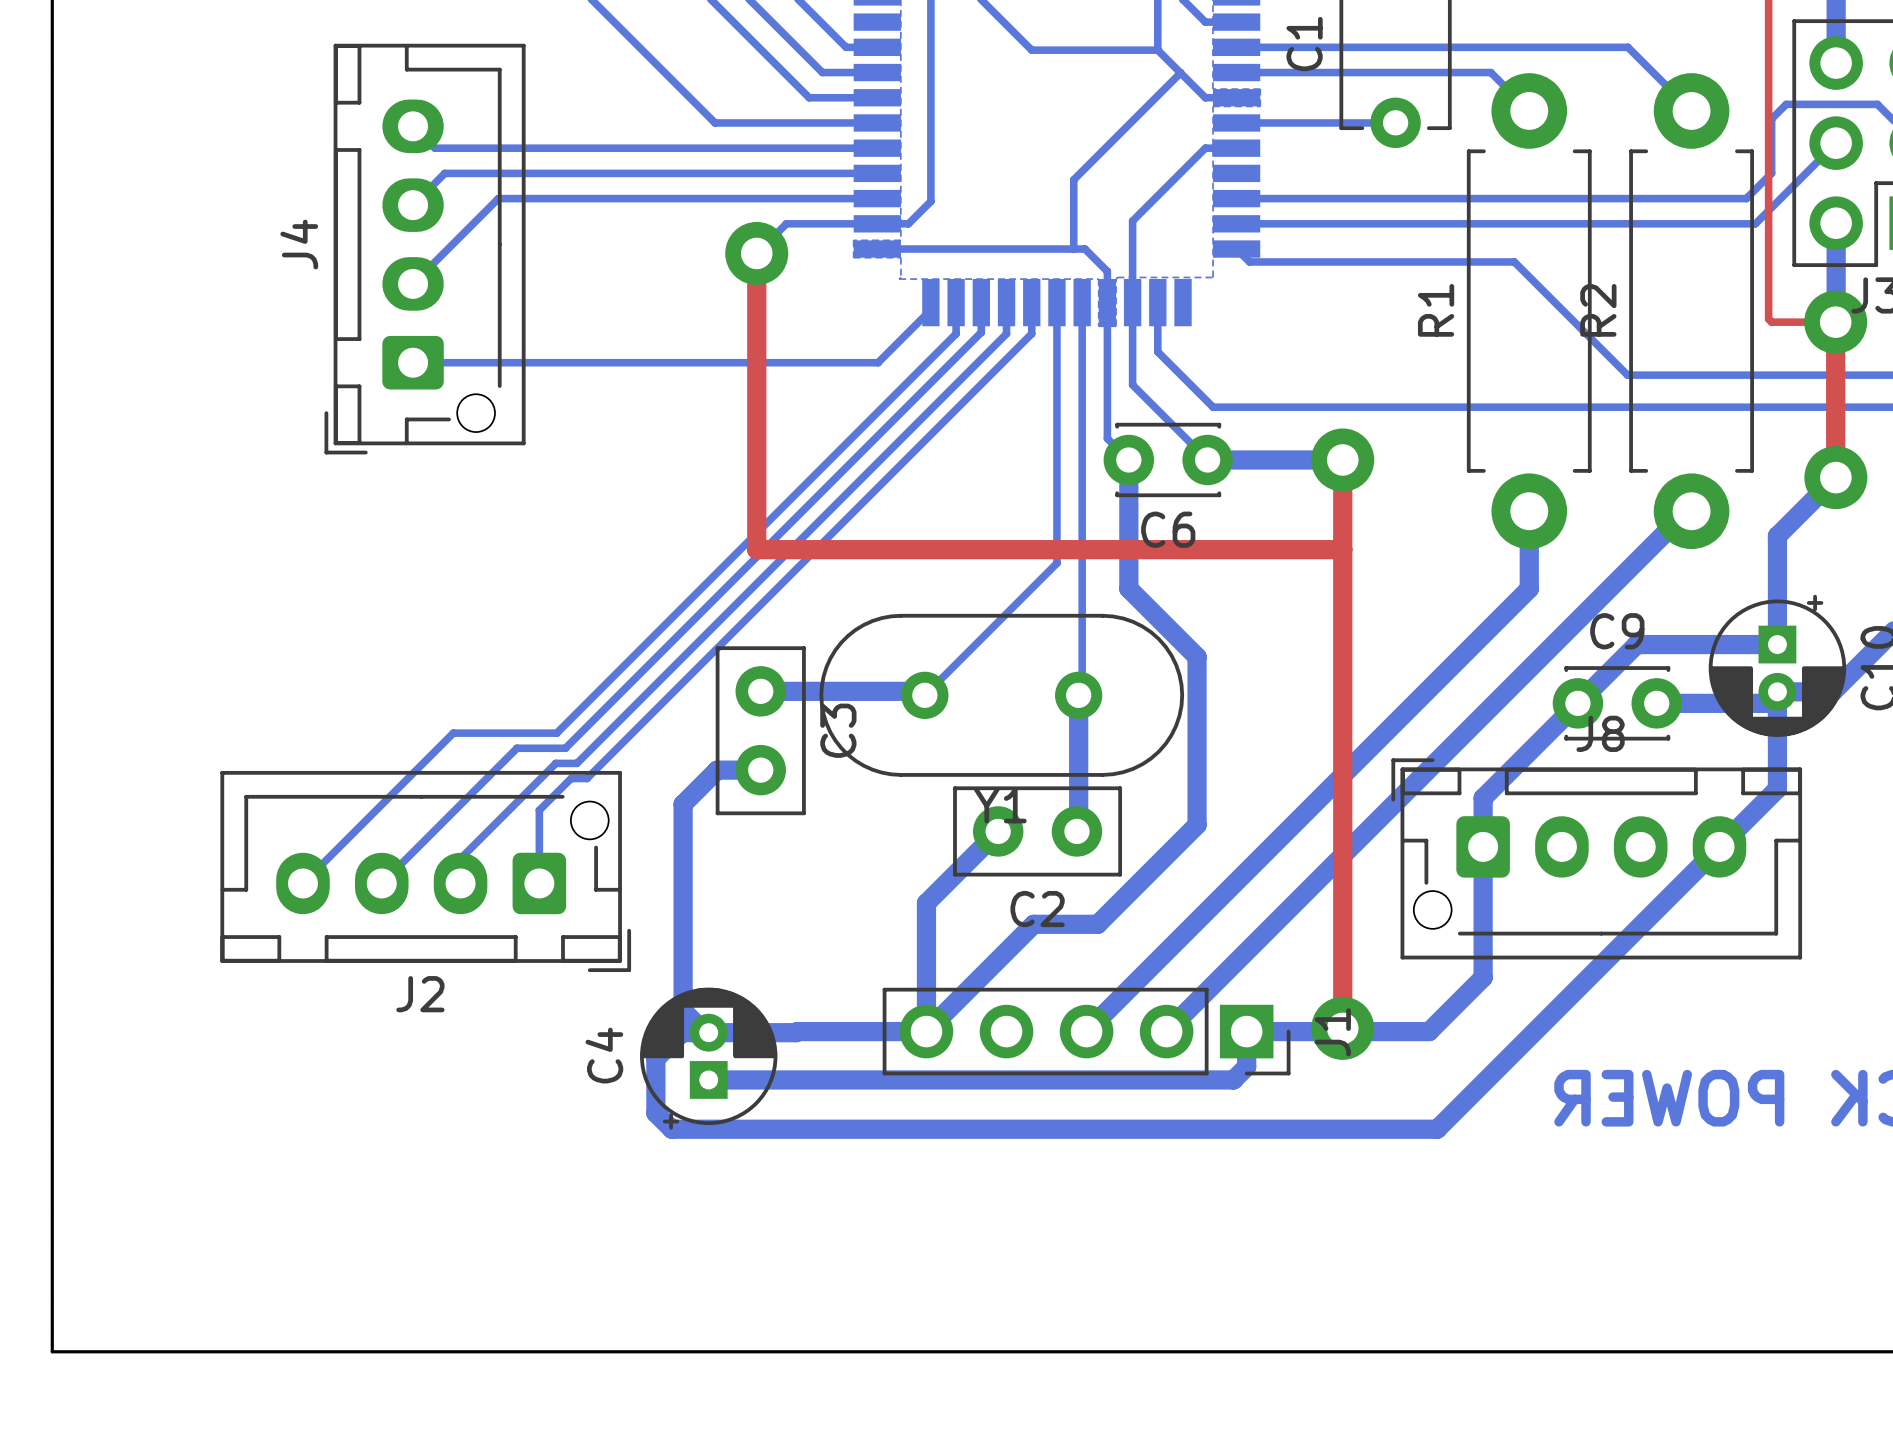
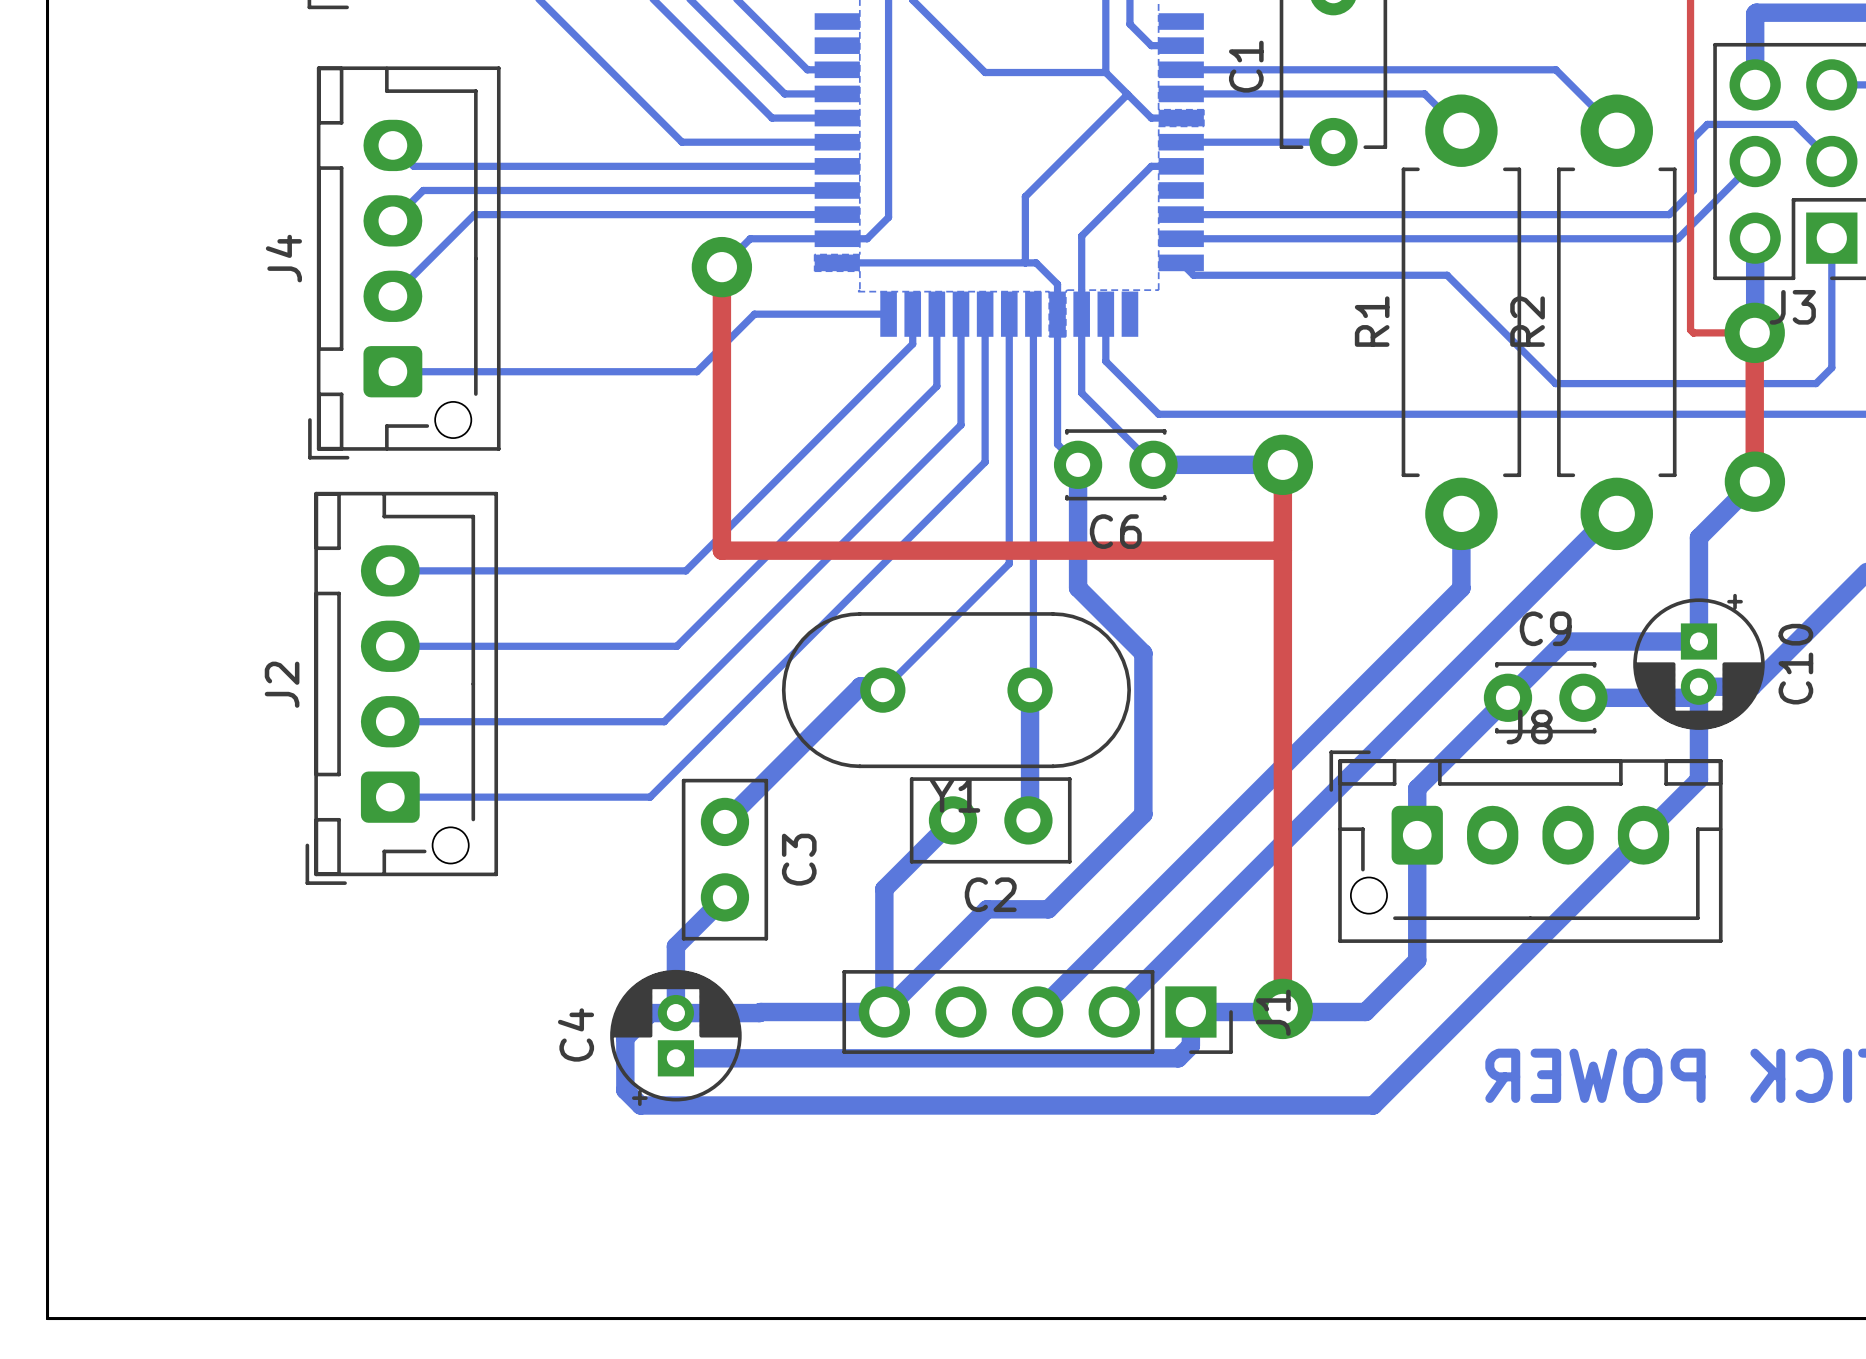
bottom track: (930, 302) (930, 309) (878, 362) (730, 362) -> (888, 314) (754, 314) (696, 371)
bottom track: (981, 332) (565, 748) (516, 748) (381, 883) -> (936, 342) (936, 386) (676, 646) (390, 646)
bottom track: (1006, 333) (576, 763) (555, 763) (460, 858) (460, 883) -> (960, 344) (960, 424) (664, 721) (390, 721)
bottom track: (1031, 333) (587, 778) (571, 778) (539, 810) (539, 883) -> (985, 344) (985, 462) (650, 797) (390, 797)
bottom track: (719, 570) (556, 733) (453, 733) (302, 883) -> (685, 570) (390, 570)
bottom track: (760, 691) (901, 691) -> (724, 821) (860, 686)
C3 position: (760, 730) -> (724, 859)
bottom track: (760, 770) (717, 770) (683, 804) (683, 1010) (705, 1032) -> none
J2 rotation: 0° (425, 871) -> 90° clockwise (401, 688)
bottom track: none -> (724, 897) (675, 946) (675, 1013)

